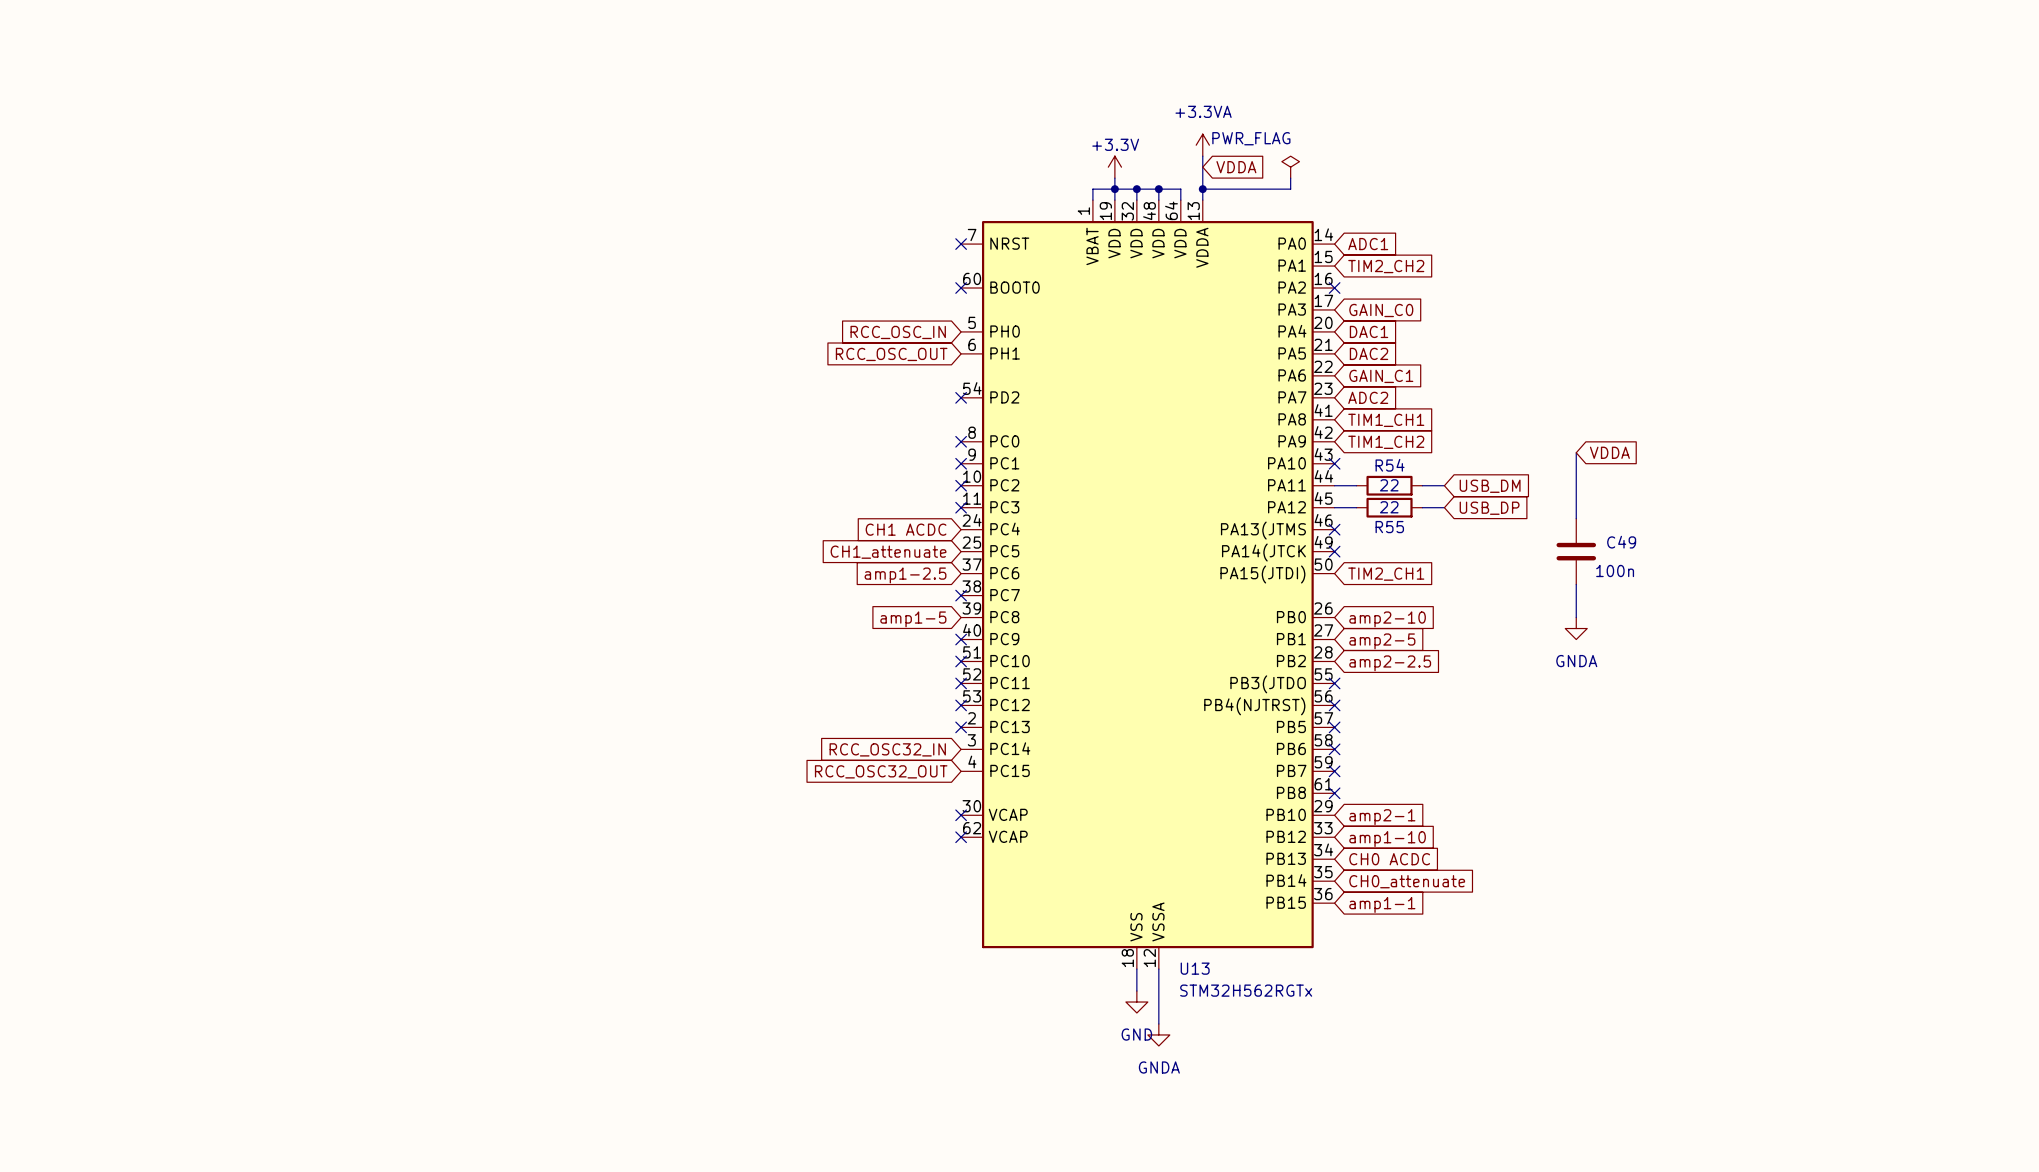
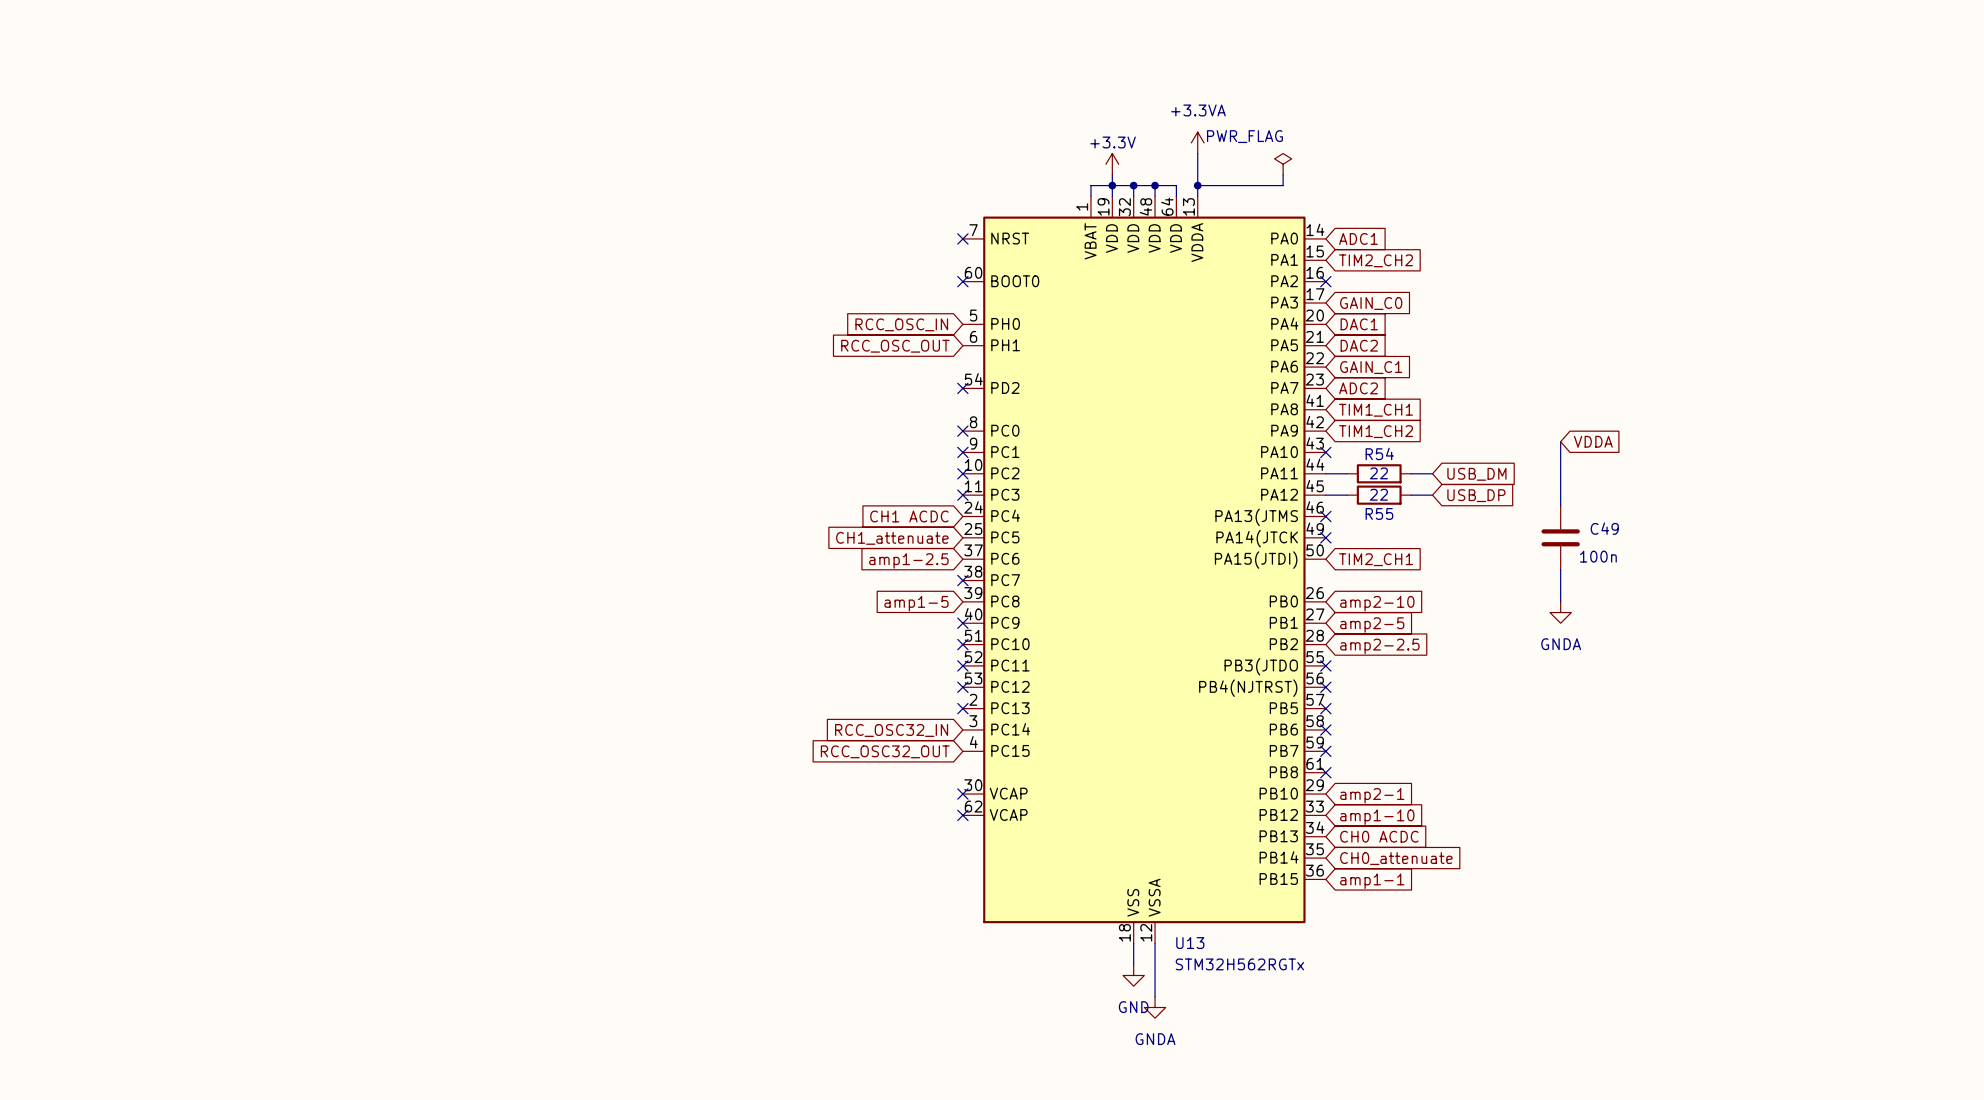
global label: VDDA (1236, 167) -> none

